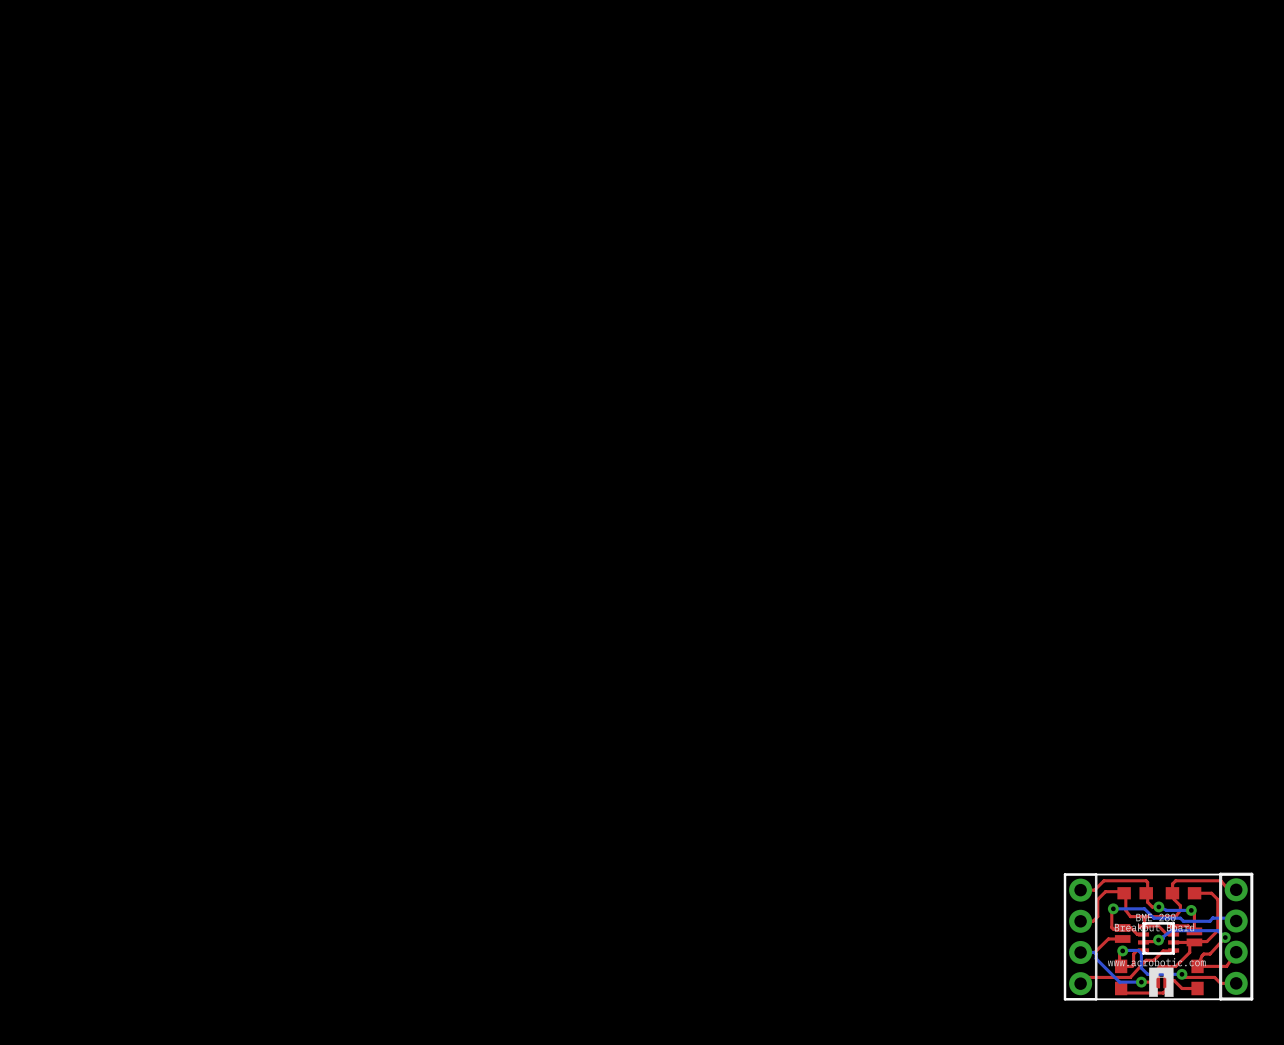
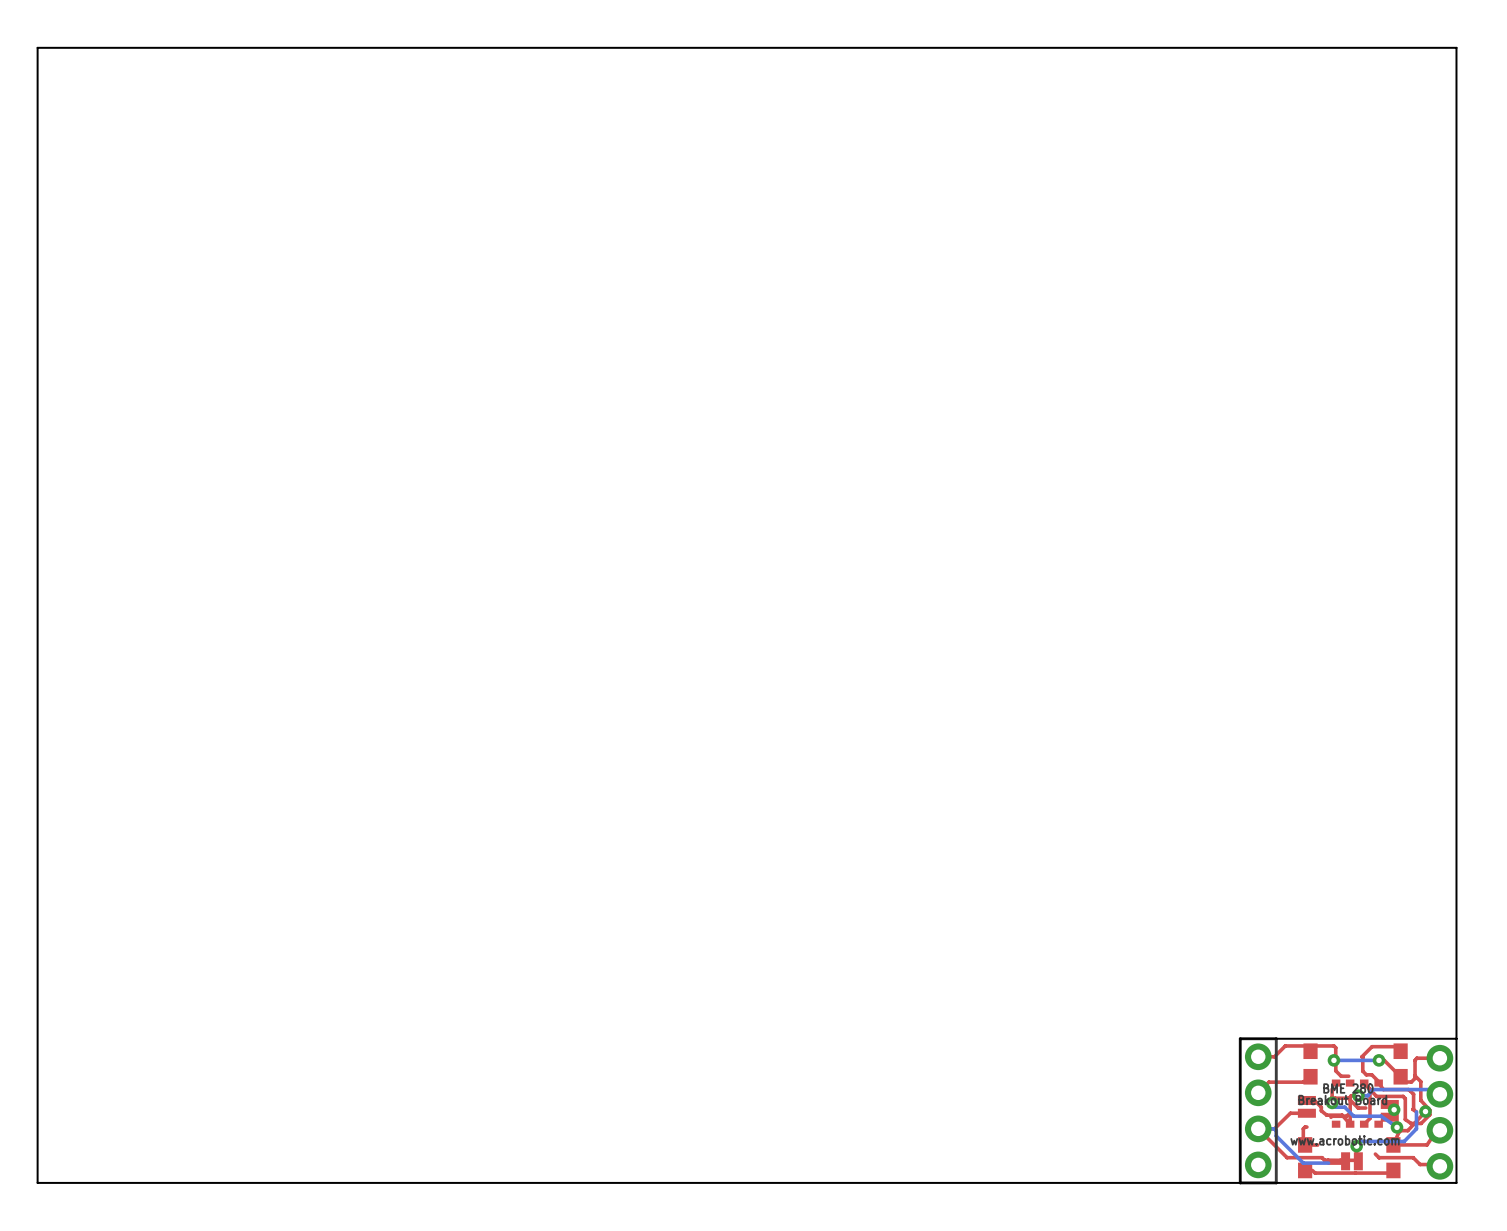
part footprint: [1219, 872, 1254, 1001] -> [1426, 1044, 1454, 1180]
board edge: none -> (1456, 1038) (1456, 47) (37, 47) (37, 1182) (1240, 1182)
top track: none -> (1400, 1051) (1400, 1056) (1400, 1051) (1395, 1046) (1372, 1046) (1361, 1056) (1362, 1071) (1366, 1074) (1371, 1074) (1383, 1089) (1408, 1089) (1413, 1094) (1412, 1109) (1416, 1111)
top track: (1236, 889) (1228, 889) (1220, 880) (1175, 880) (1172, 883) (1172, 893) (1174, 899) (1180, 905) (1180, 910) (1175, 916) (1144, 918) (1130, 916) (1125, 910) (1125, 894) (1124, 893) (1127, 891) (1105, 891) (1097, 899) (1097, 916) (1093, 921) (1080, 921) -> (1310, 1076) (1303, 1082) (1268, 1082) (1258, 1092)
top track: none -> (1439, 1058) (1416, 1058) (1415, 1060) (1415, 1078) (1411, 1082) (1400, 1082) (1400, 1076) (1384, 1060) (1378, 1060)
part rotation: 0° (1135, 893) -> 90° clockwise (1310, 1063)
via: none -> (1333, 1060)
part rotation: 0° (1183, 893) -> 90° clockwise (1400, 1063)
bottom track: none -> (1378, 1060) (1333, 1060)
via: none -> (1378, 1060)
top track: (1194, 893) (1211, 893) (1217, 899) (1217, 930) (1206, 941) (1193, 943) -> none
bottom track: (1158, 906) (1166, 910) (1191, 910) -> none
via: (1158, 906) -> none
top track: none -> (1415, 1075) (1420, 1081) (1420, 1100) (1429, 1110) (1429, 1114) (1421, 1123) (1411, 1123) (1405, 1119) (1405, 1098) (1403, 1096) (1376, 1096) (1364, 1083) (1369, 1089) (1369, 1118) (1364, 1124)
top track: (1113, 908) (1111, 911) (1113, 929) (1130, 927) (1137, 934) (1143, 934) -> none
bottom track: (1113, 908) (1144, 908) (1153, 918) (1180, 918) (1183, 921) (1210, 921) (1212, 917) (1233, 918) (1236, 921) -> none
via: (1113, 908) -> none
top track: (1191, 910) (1194, 913) (1194, 931) (1188, 925) (1173, 926) -> none
via: (1191, 910) -> none
part footprint: [1137, 922, 1180, 954] -> [1331, 1079, 1383, 1128]
bottom track: none -> (1439, 1094) (1428, 1089) (1372, 1089) (1367, 1095) (1358, 1095)
top track: none -> (1358, 1095) (1350, 1097) (1350, 1124) (1342, 1115) (1326, 1115) (1314, 1100) (1306, 1100)
via: none -> (1358, 1095)
bottom track: none -> (1332, 1102) (1335, 1107) (1344, 1107) (1353, 1116) (1381, 1116) (1397, 1127)
via: none -> (1332, 1102)
via: none -> (1394, 1109)
bottom track: none -> (1416, 1111) (1416, 1128) (1404, 1141) (1361, 1141) (1356, 1146)
bottom track: (1225, 937) (1217, 930) (1171, 930) (1161, 940) (1158, 940) -> none
via: (1158, 940) -> none
top track: (1173, 942) (1194, 942) (1189, 944) (1189, 952) (1175, 966) (1160, 966) (1157, 969) (1156, 976) -> none
bottom track: (1122, 950) (1138, 950) (1141, 953) (1141, 968) (1147, 974) (1181, 974) -> none
via: (1122, 950) -> none
top track: (1143, 950) (1137, 950) (1133, 954) (1132, 966) -> none
top track: (1173, 950) (1176, 950) (1163, 950) (1153, 960) (1146, 960) (1130, 977) -> (1356, 1146) (1355, 1160) (1324, 1160) (1322, 1157) (1315, 1157)
via: none -> (1397, 1127)
drawing: [1149, 967, 1174, 997] -> none
via: none -> (1356, 1146)
via: (1181, 974) -> none
top track: (1105, 977) (1088, 977) (1080, 983) -> (1287, 1157) (1258, 1128)
via: (1141, 982) -> none
top track: (1197, 988) (1182, 988) (1174, 980) (1167, 980) (1167, 989) (1163, 993) (1125, 993) (1121, 988) -> none
top track: none -> (1397, 1170) (1394, 1173) (1315, 1173) (1312, 1170)

